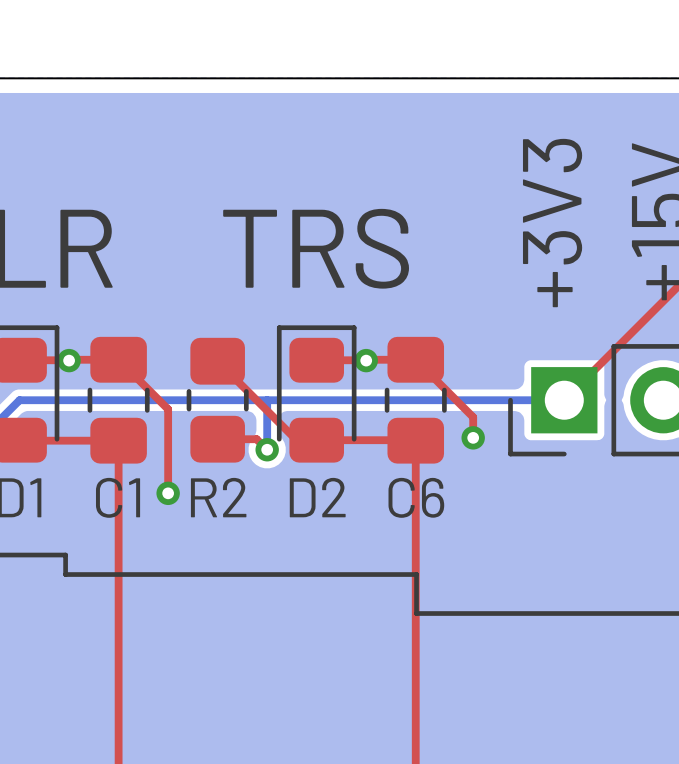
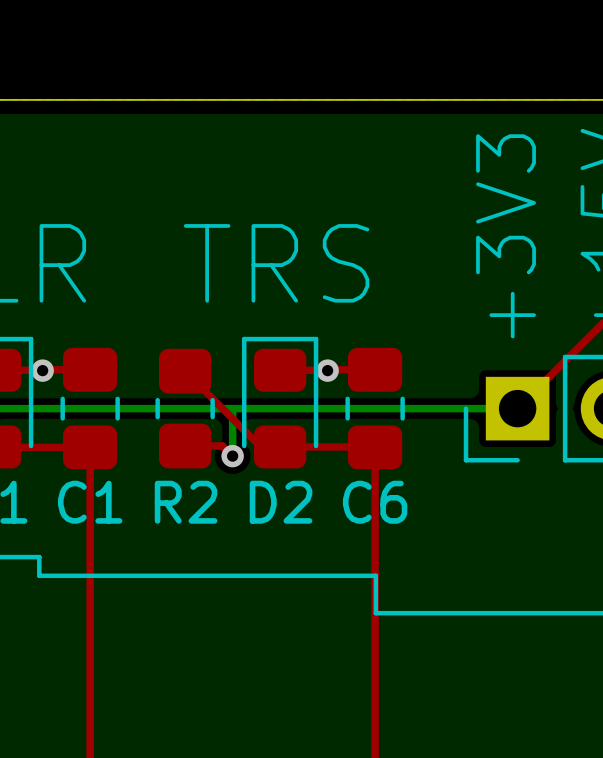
top track: (118, 359) (168, 409) (168, 493) -> none
top track: (415, 359) (473, 417) (473, 437) -> none
via: (473, 437) -> none
via: (168, 493) -> none

